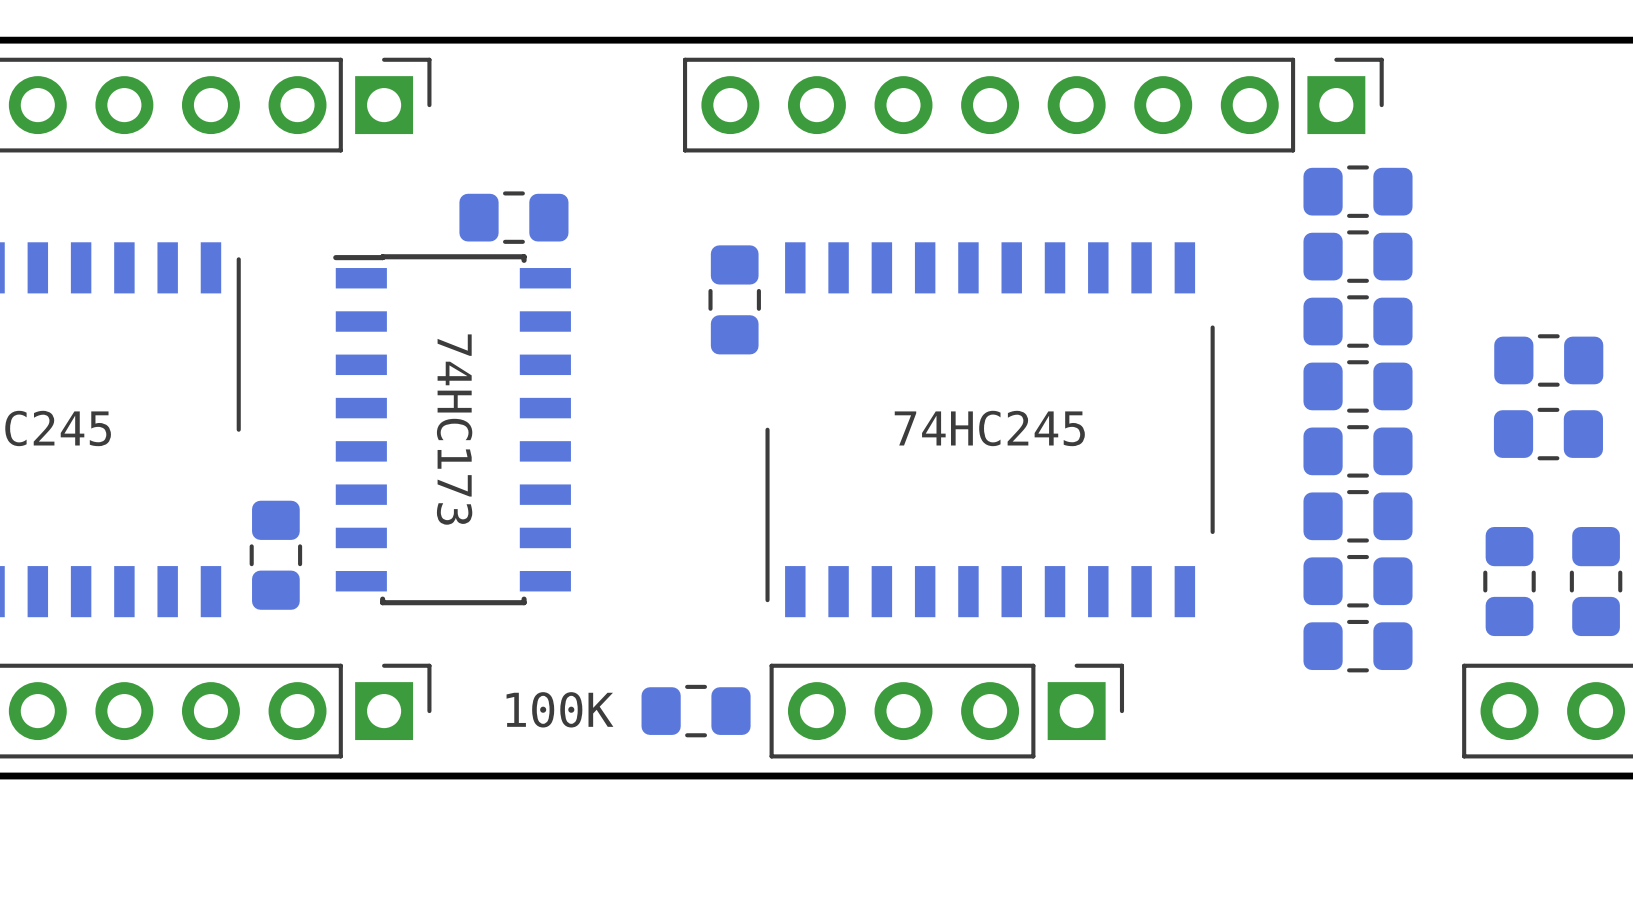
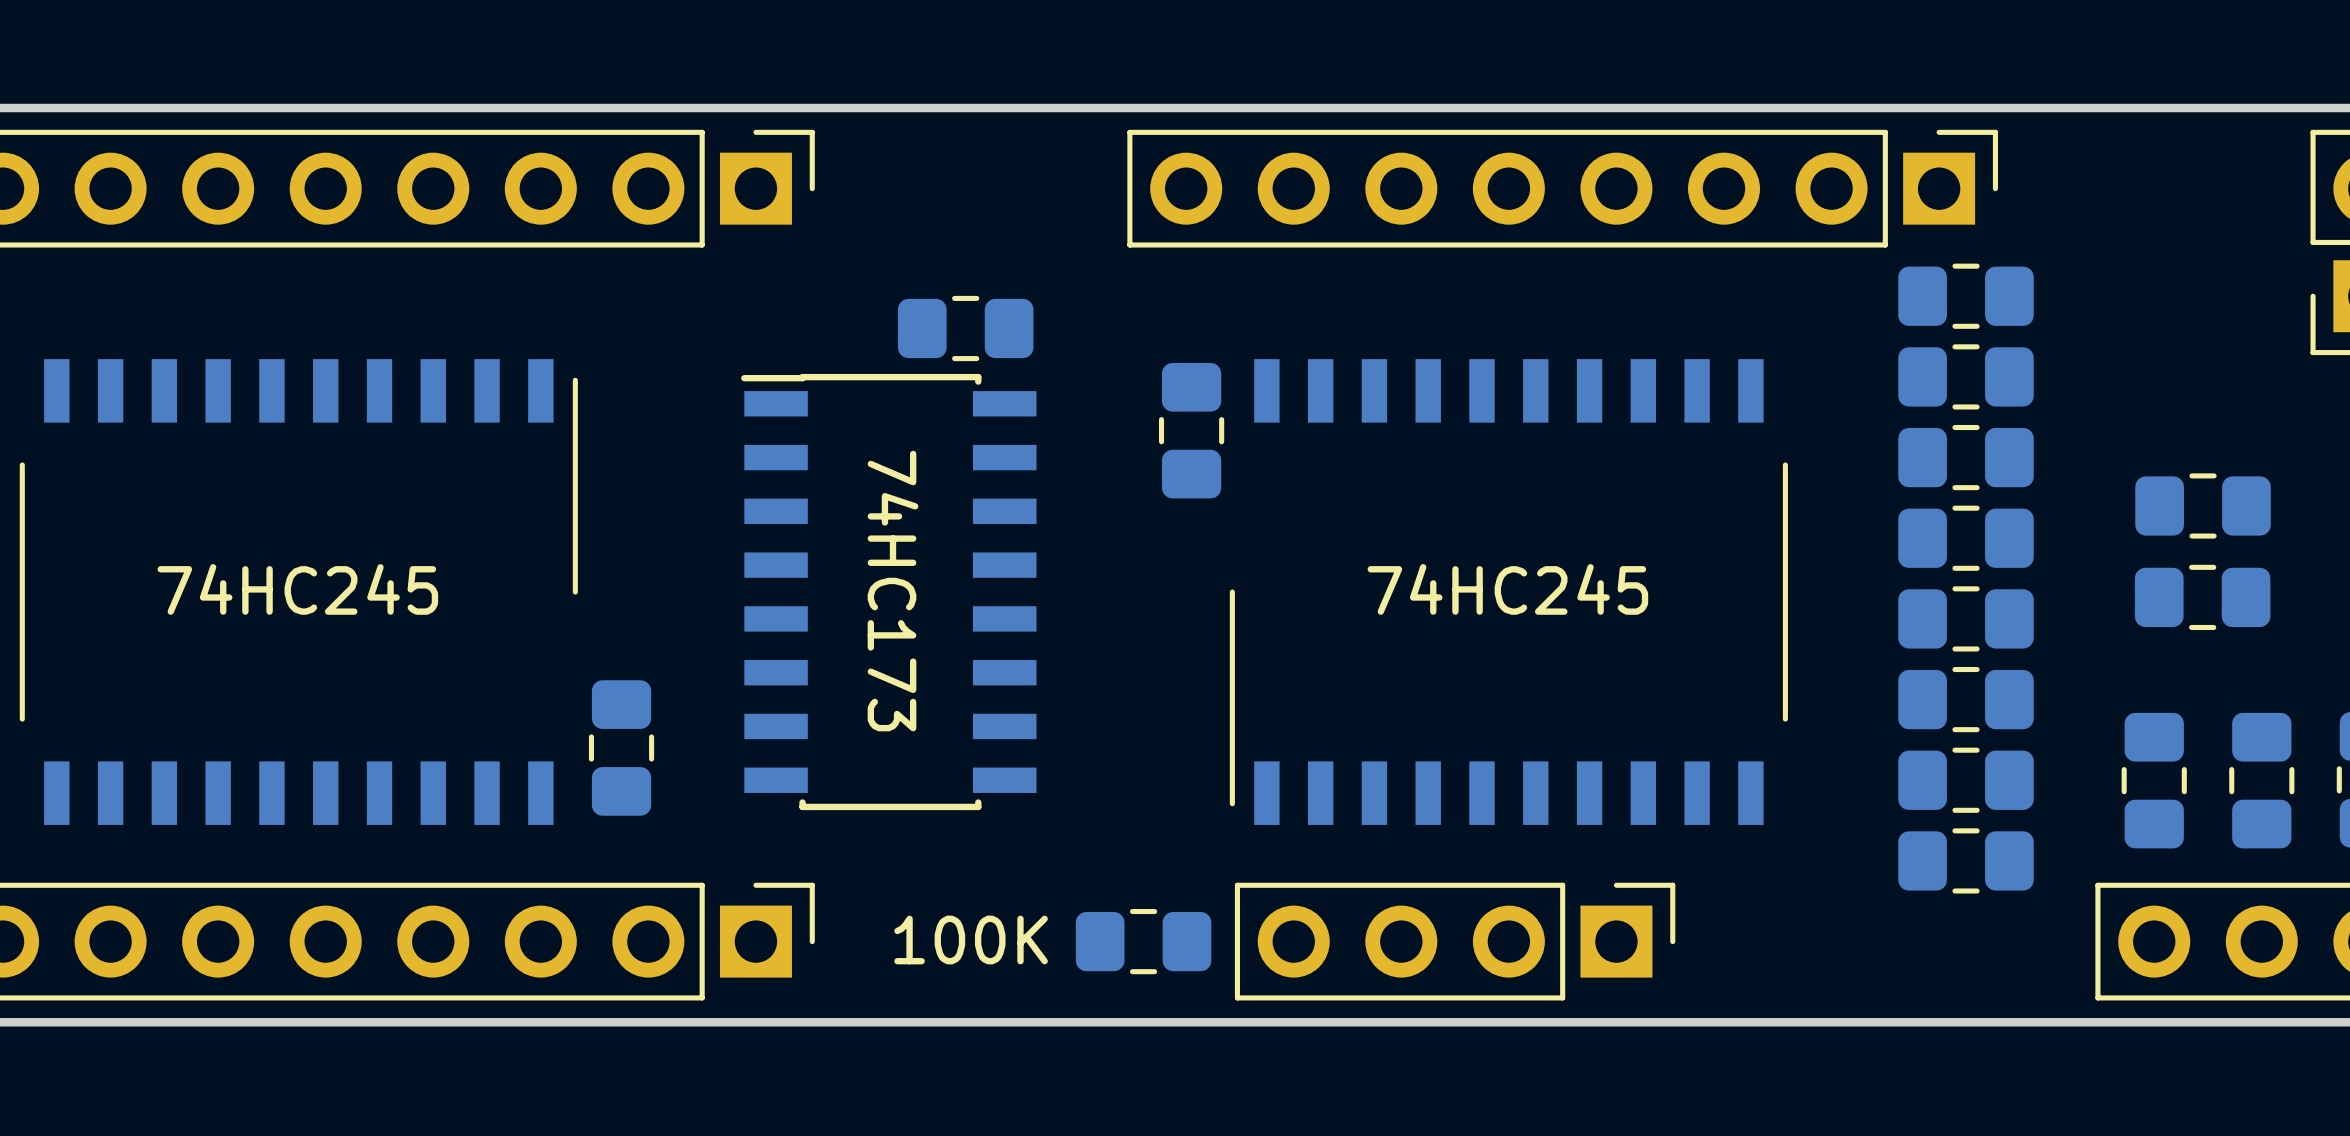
part position: (513, 217) -> (965, 328)
part position: (452, 429) -> (888, 592)

